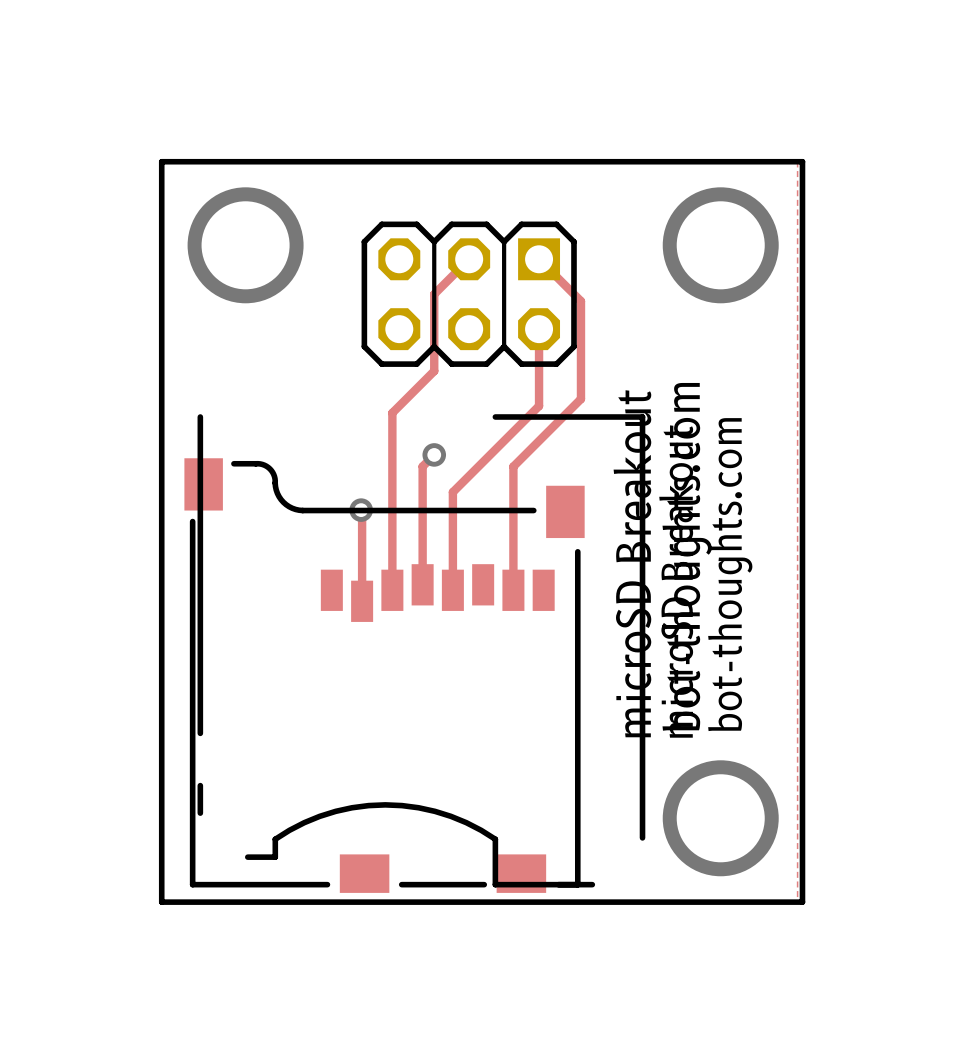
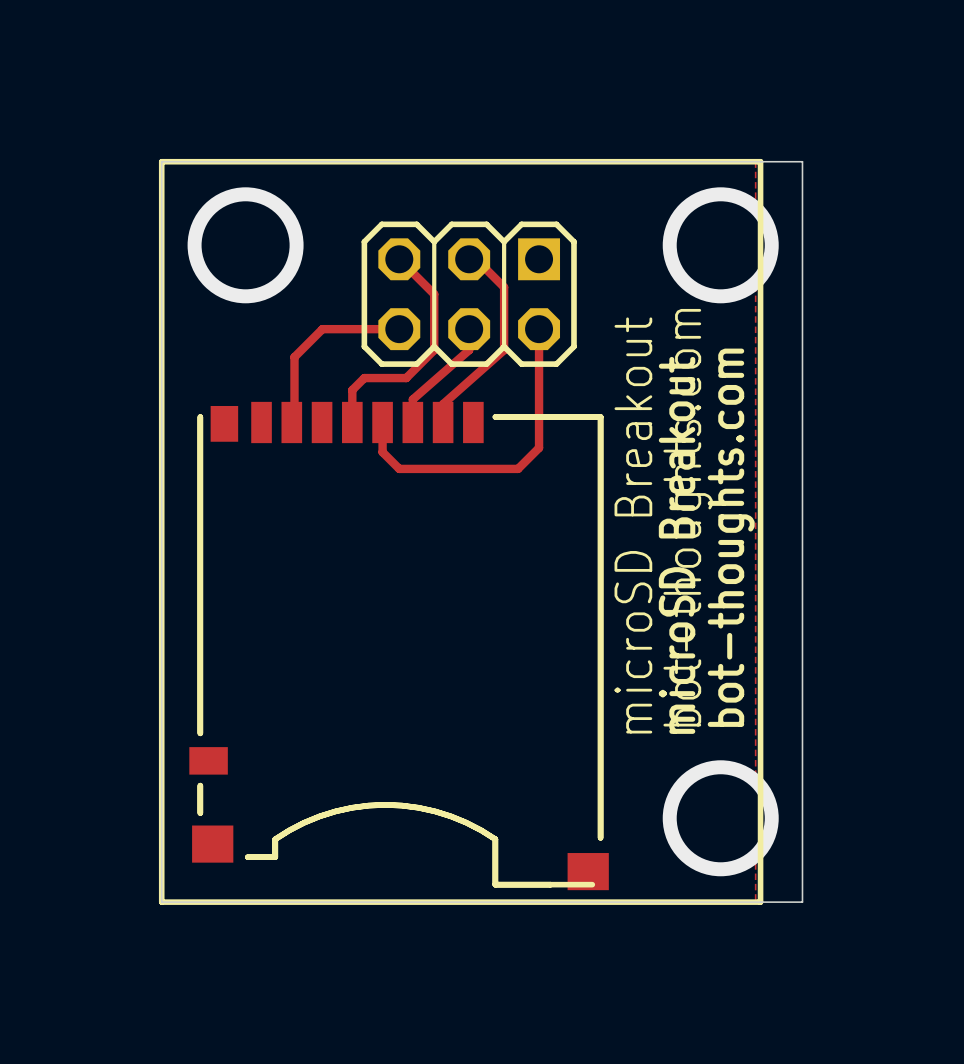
zone outline: (755, 161) (797, 161) (797, 902) (755, 902) -> (755, 161) (755, 902)
line: (760, 161) (802, 161) (802, 902) (760, 902) -> (760, 161) (760, 902)
track: (469, 259) (434, 294) -> (399, 259) (434, 294)
track: none -> (476, 259) (504, 287) (504, 350) (443, 404) (443, 422)
track: (539, 259) (580, 301) (580, 399) (513, 466) (513, 590) -> none
track: none -> (399, 329) (322, 329) (294, 357) (294, 422) (291, 422)
track: none -> (469, 329) (469, 350) (412, 399) (412, 422)
track: (434, 350) (434, 371) (392, 412) (392, 590) -> (434, 350) (406, 378) (364, 378) (352, 390) (352, 422)
track: (539, 406) (452, 492) (452, 590) -> (539, 406) (539, 447) (518, 468) (399, 468) (382, 452) (382, 422)
line: (600, 416) (642, 416) (642, 837) -> (600, 416) (600, 837)
track: (434, 454) (422, 466) (422, 584) -> none
via: (434, 454) -> none
track: (361, 510) (362, 601) -> none
via: (361, 510) -> none
part: none -> (399, 646)
part: (384, 675) -> none

